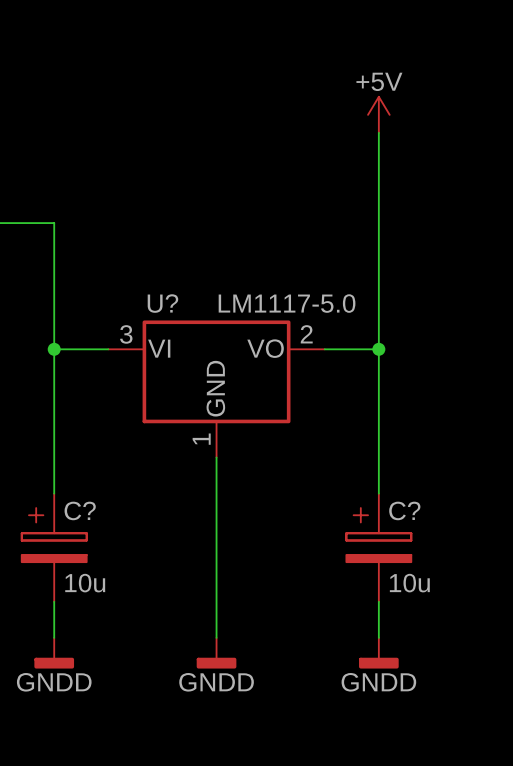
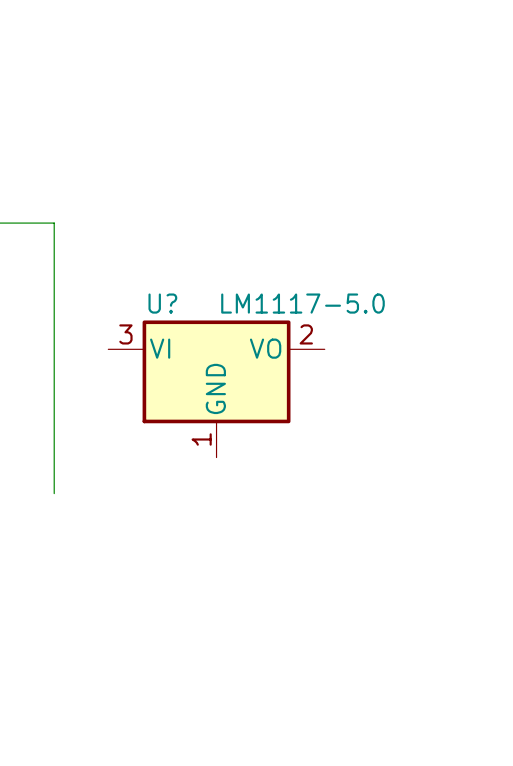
power symbol: +5V (378, 114) -> none
wire: (378, 132) (378, 493) -> none
wire: (54, 349) (108, 349) -> none
junction: (54, 349) -> none
wire: (324, 349) (378, 349) -> none
junction: (378, 349) -> none
wire: (216, 457) (216, 637) -> none
C?: 10u (54, 547) -> none
C?: 10u (378, 547) -> none
wire: (54, 601) (54, 637) -> none
wire: (378, 601) (378, 637) -> none
power symbol: GNDD (54, 653) -> none
power symbol: GNDD (216, 653) -> none
power symbol: GNDD (378, 653) -> none

